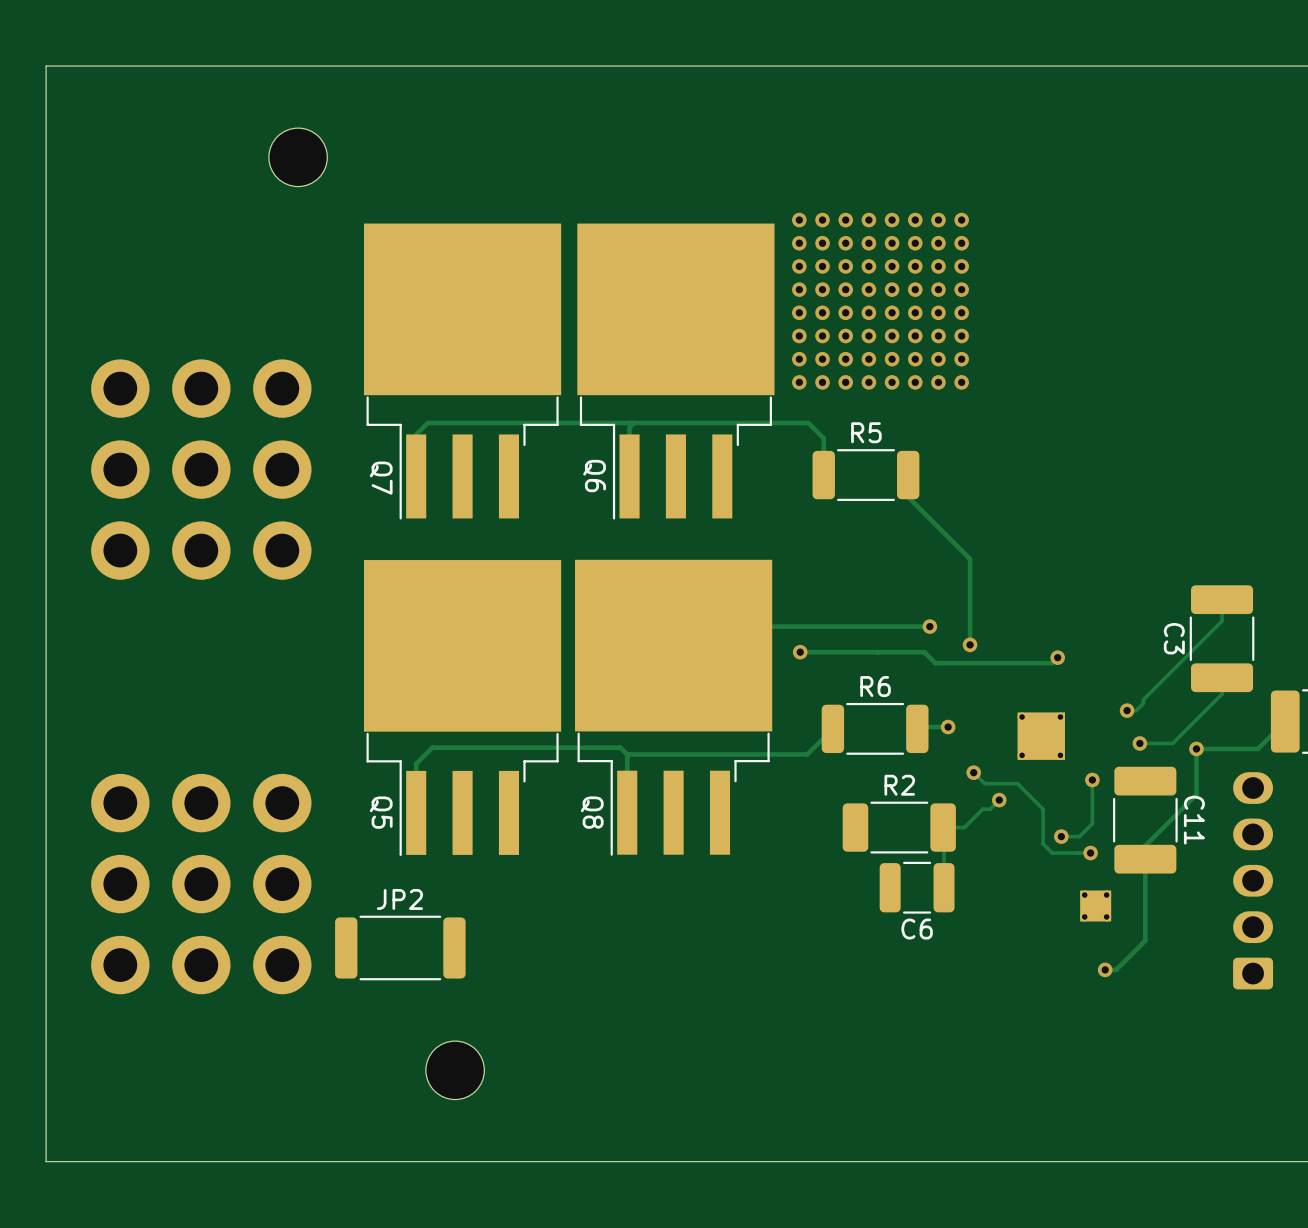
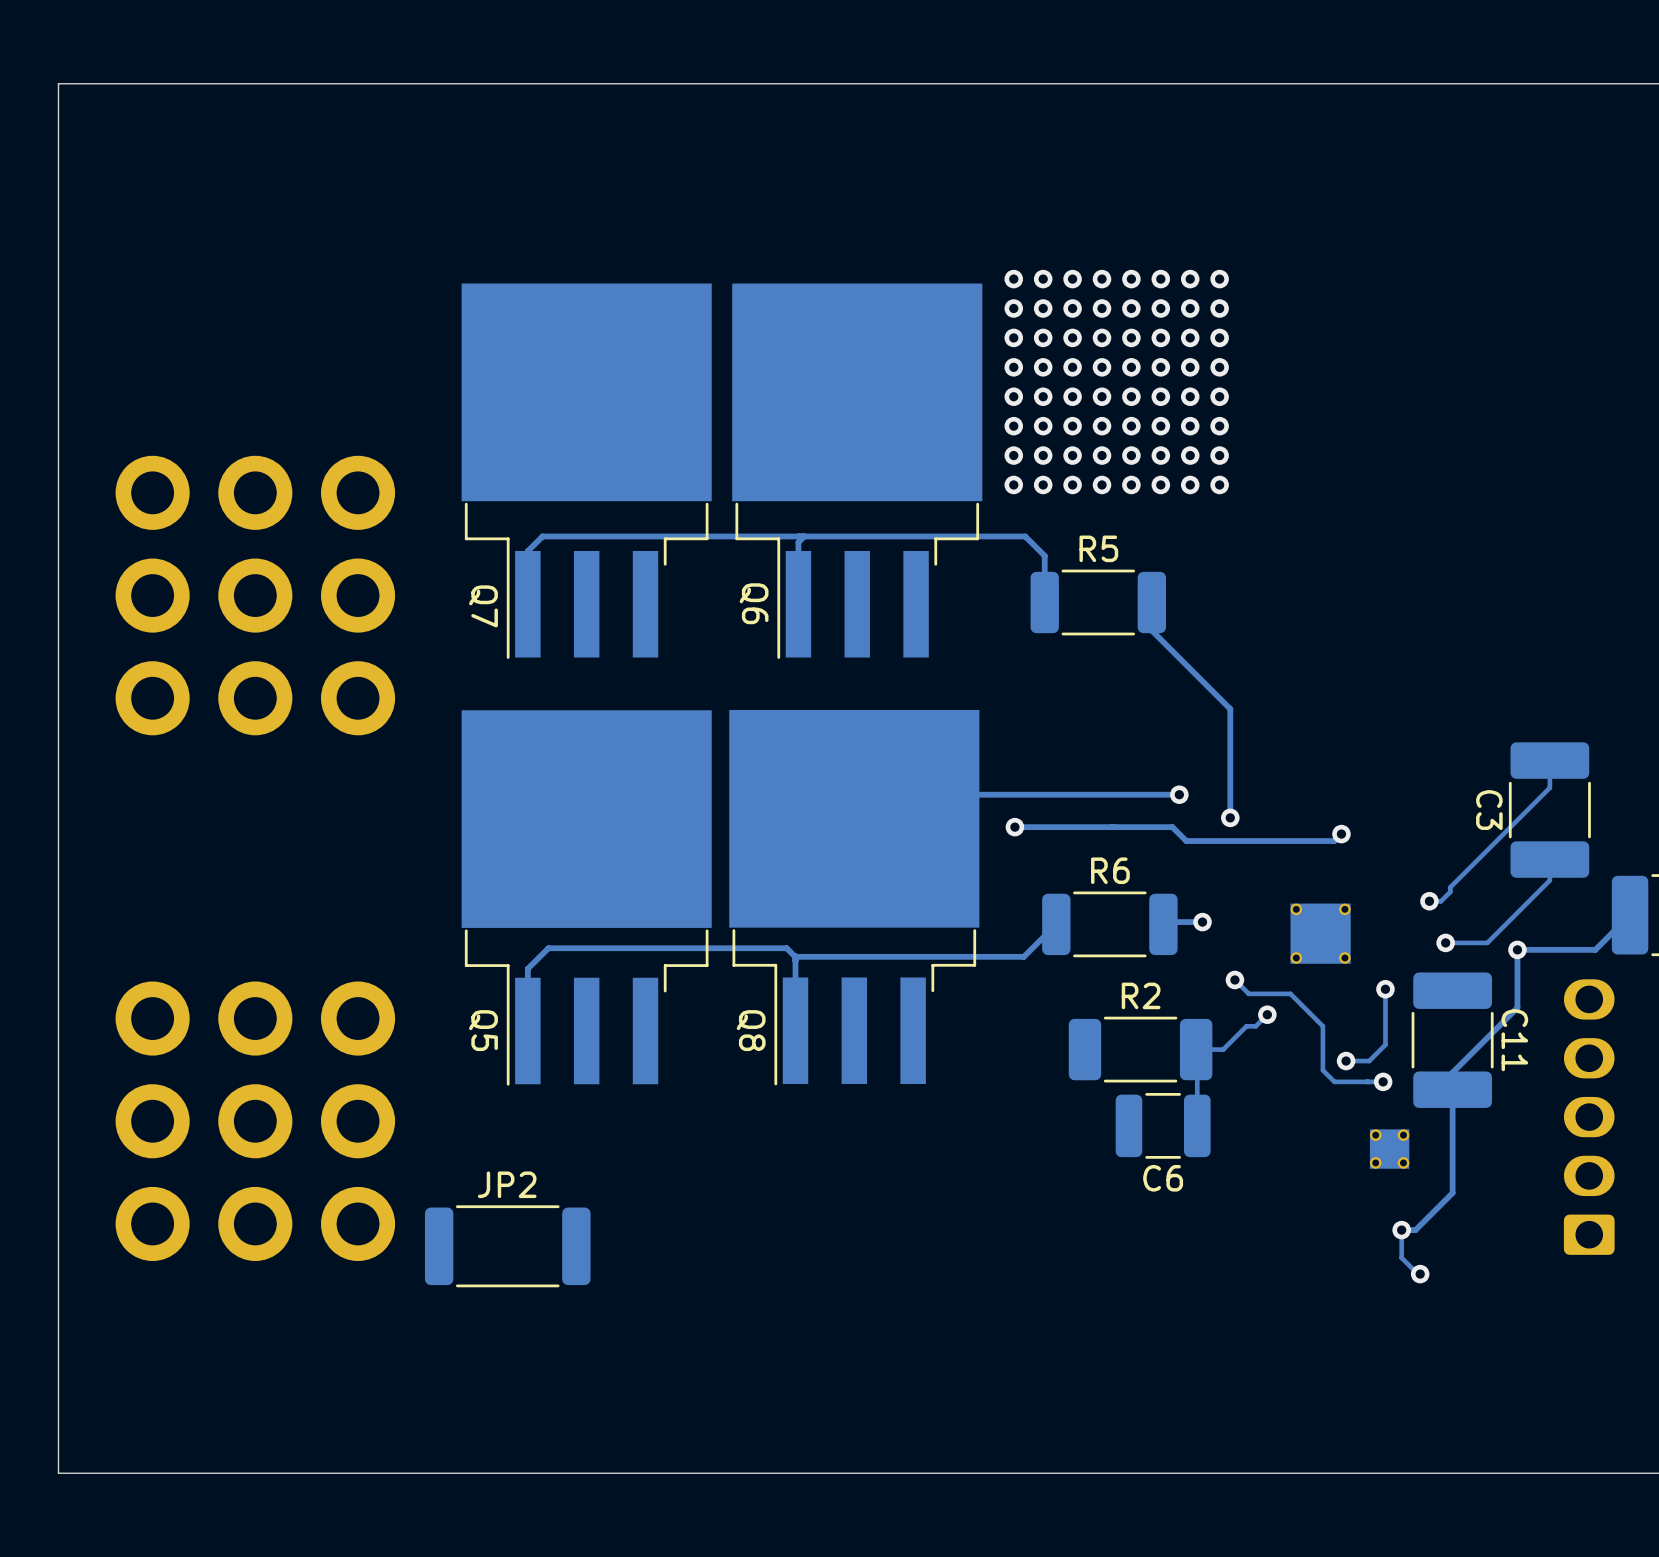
part: (298, 157) -> none
JP2 position: (400, 947) -> (507, 1246)
track: none -> (1401, 1230) (1401, 1257) (1417, 1274) (1420, 1274)
via: none -> (1420, 1274)
part: (455, 1070) -> none

